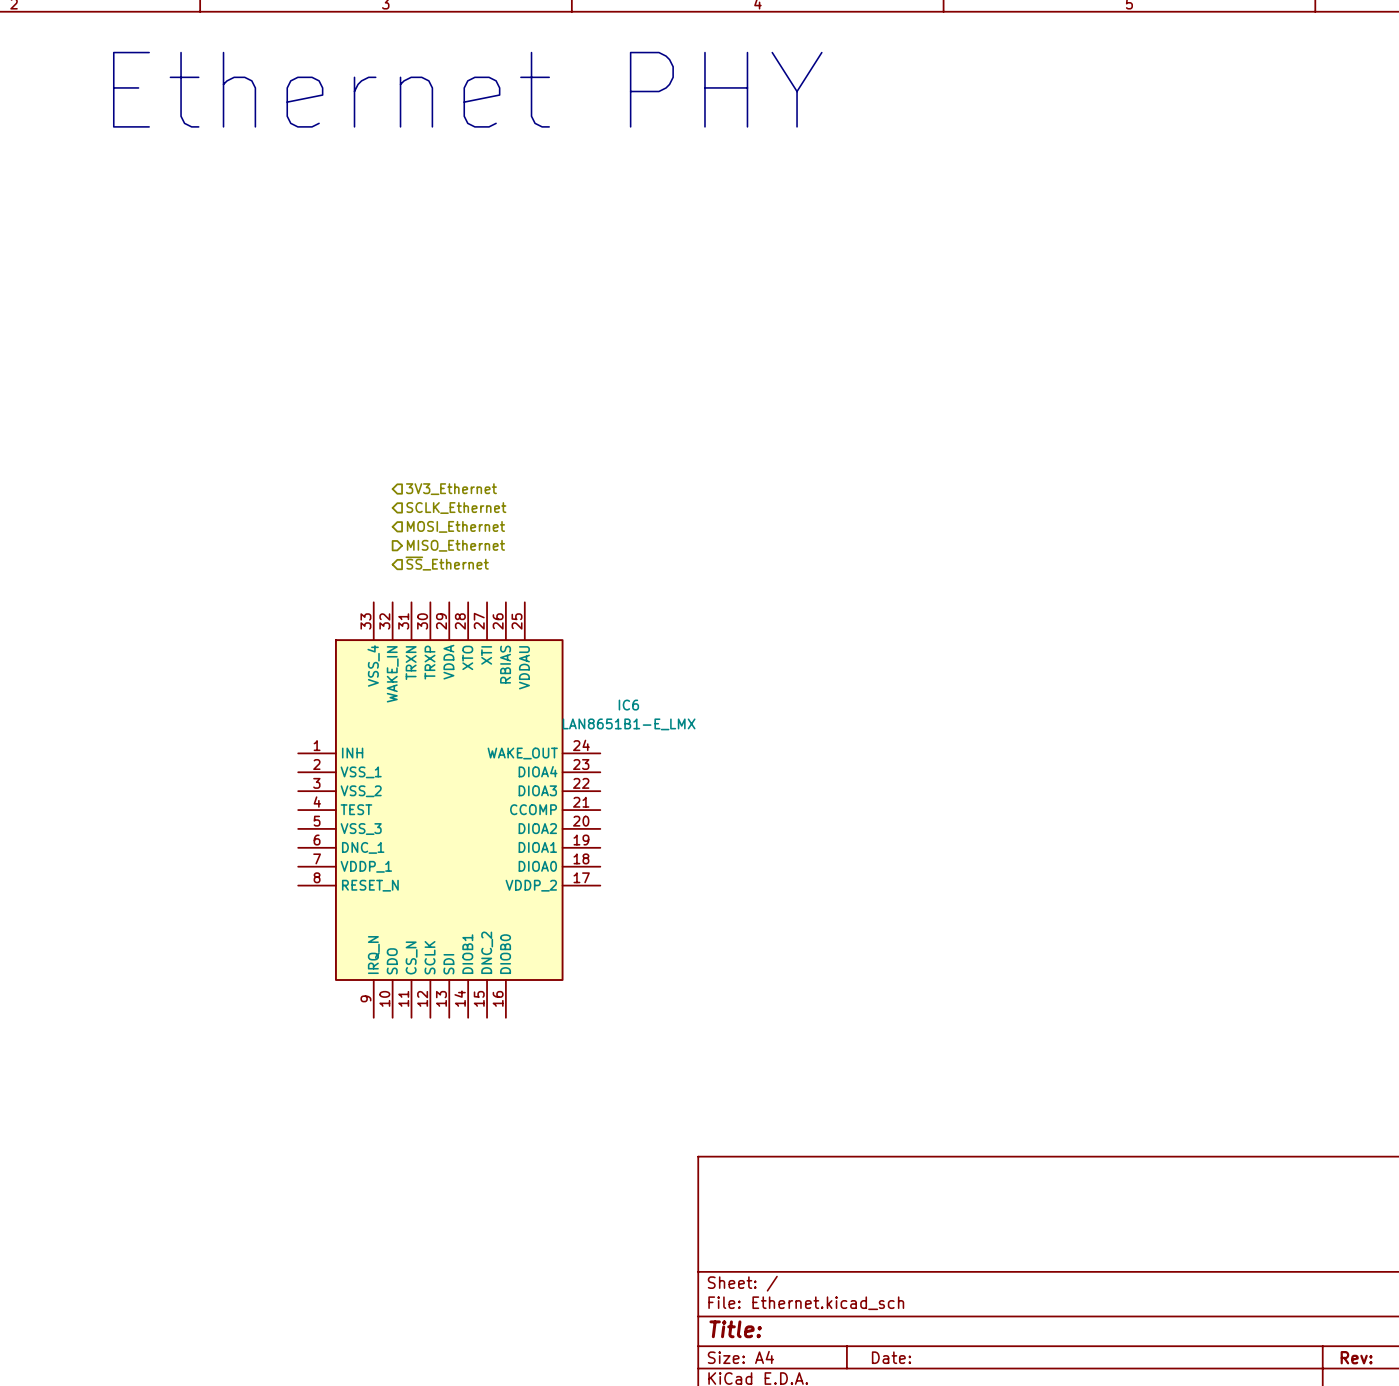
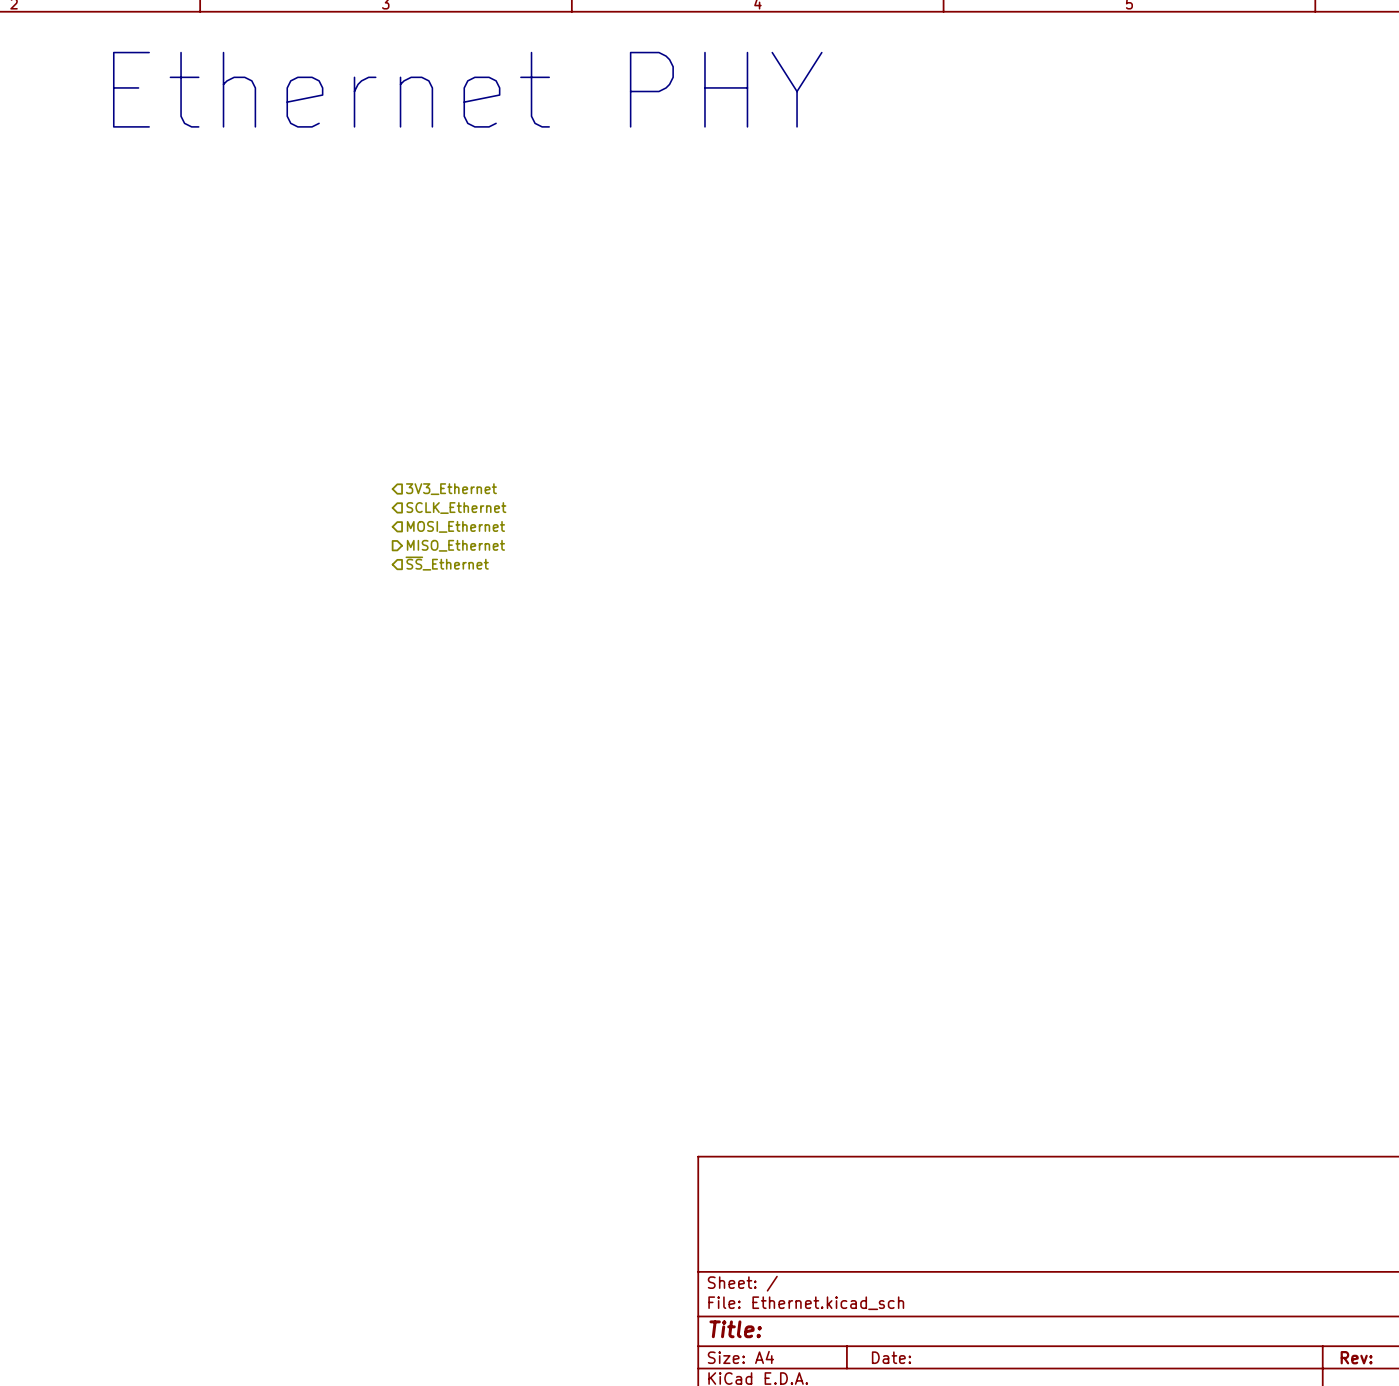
IC6: LAN8651B1-E_LMX (449, 810) -> none

